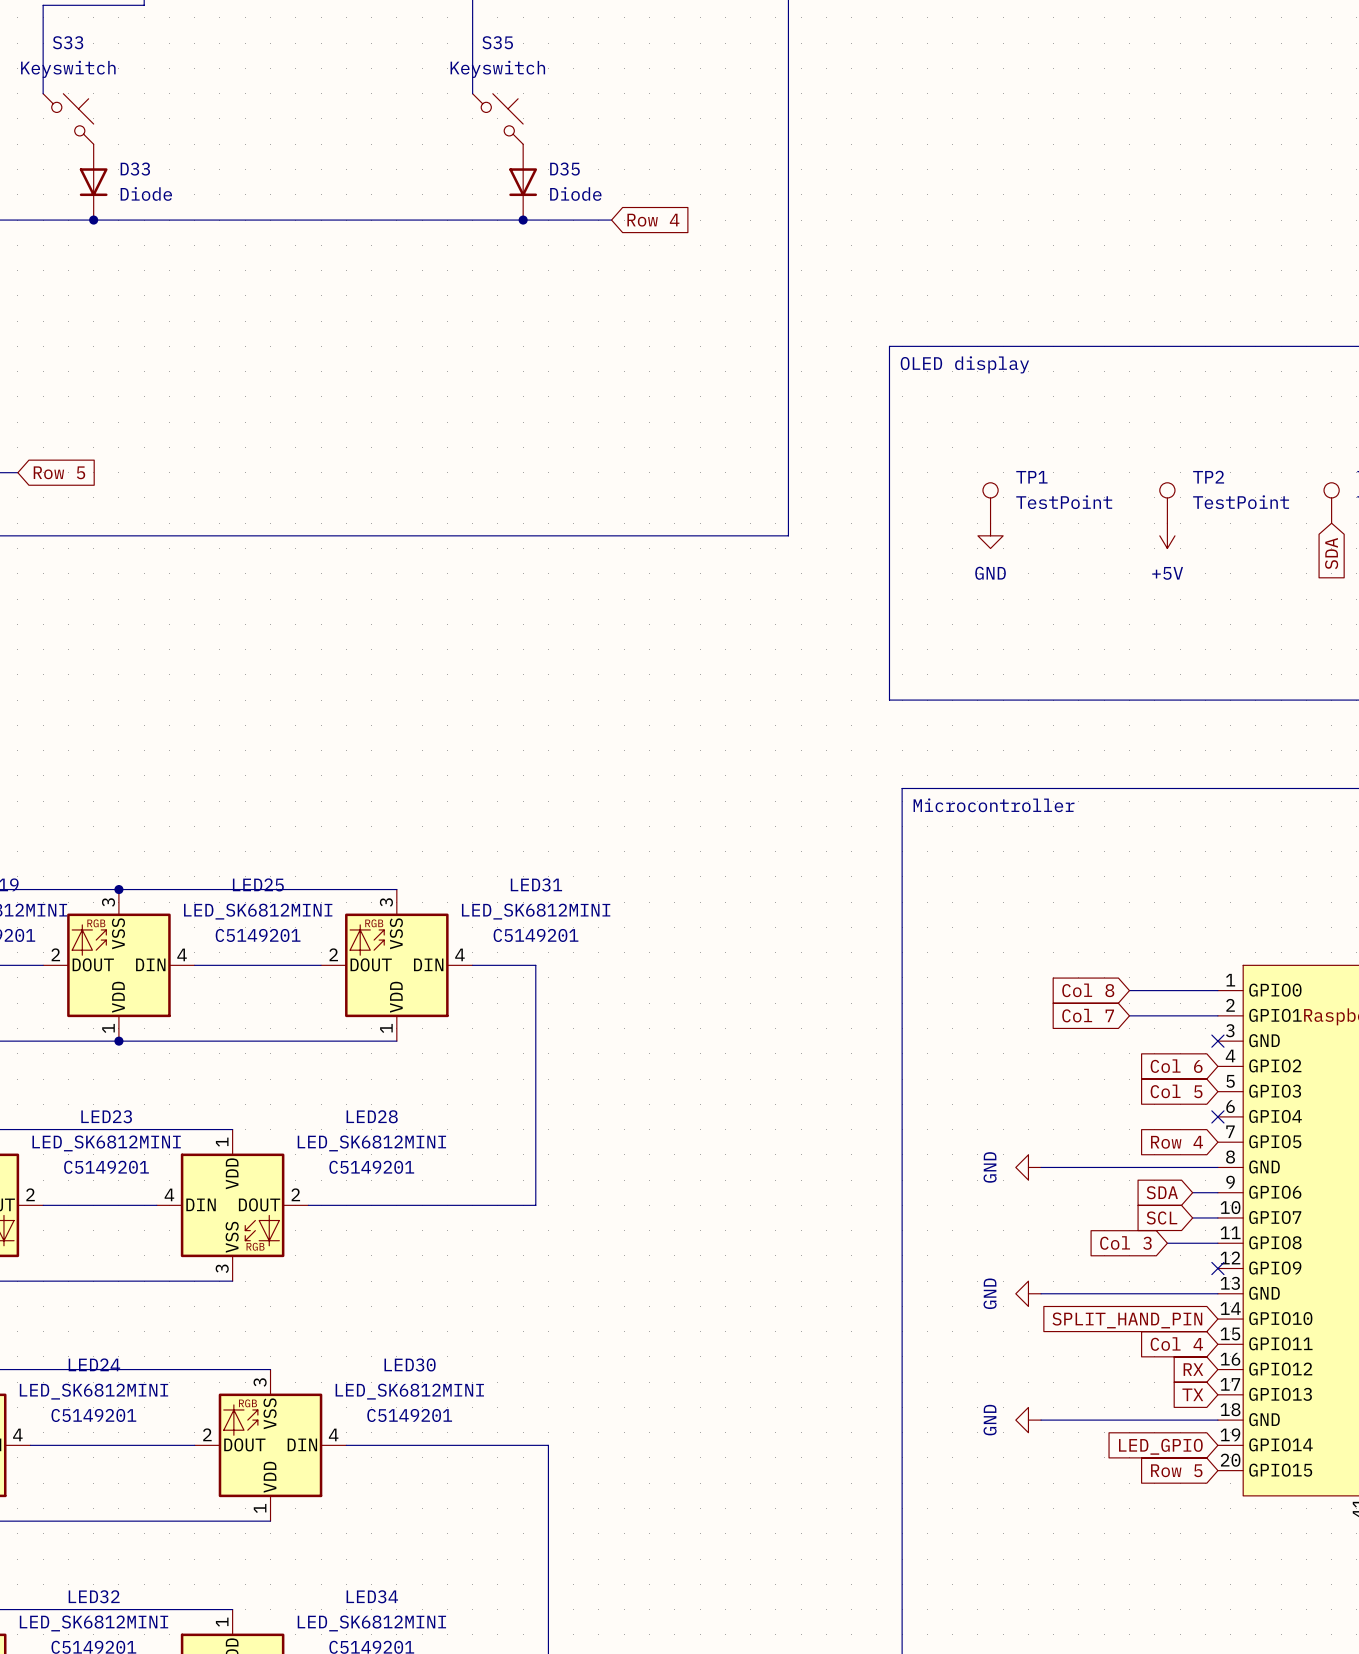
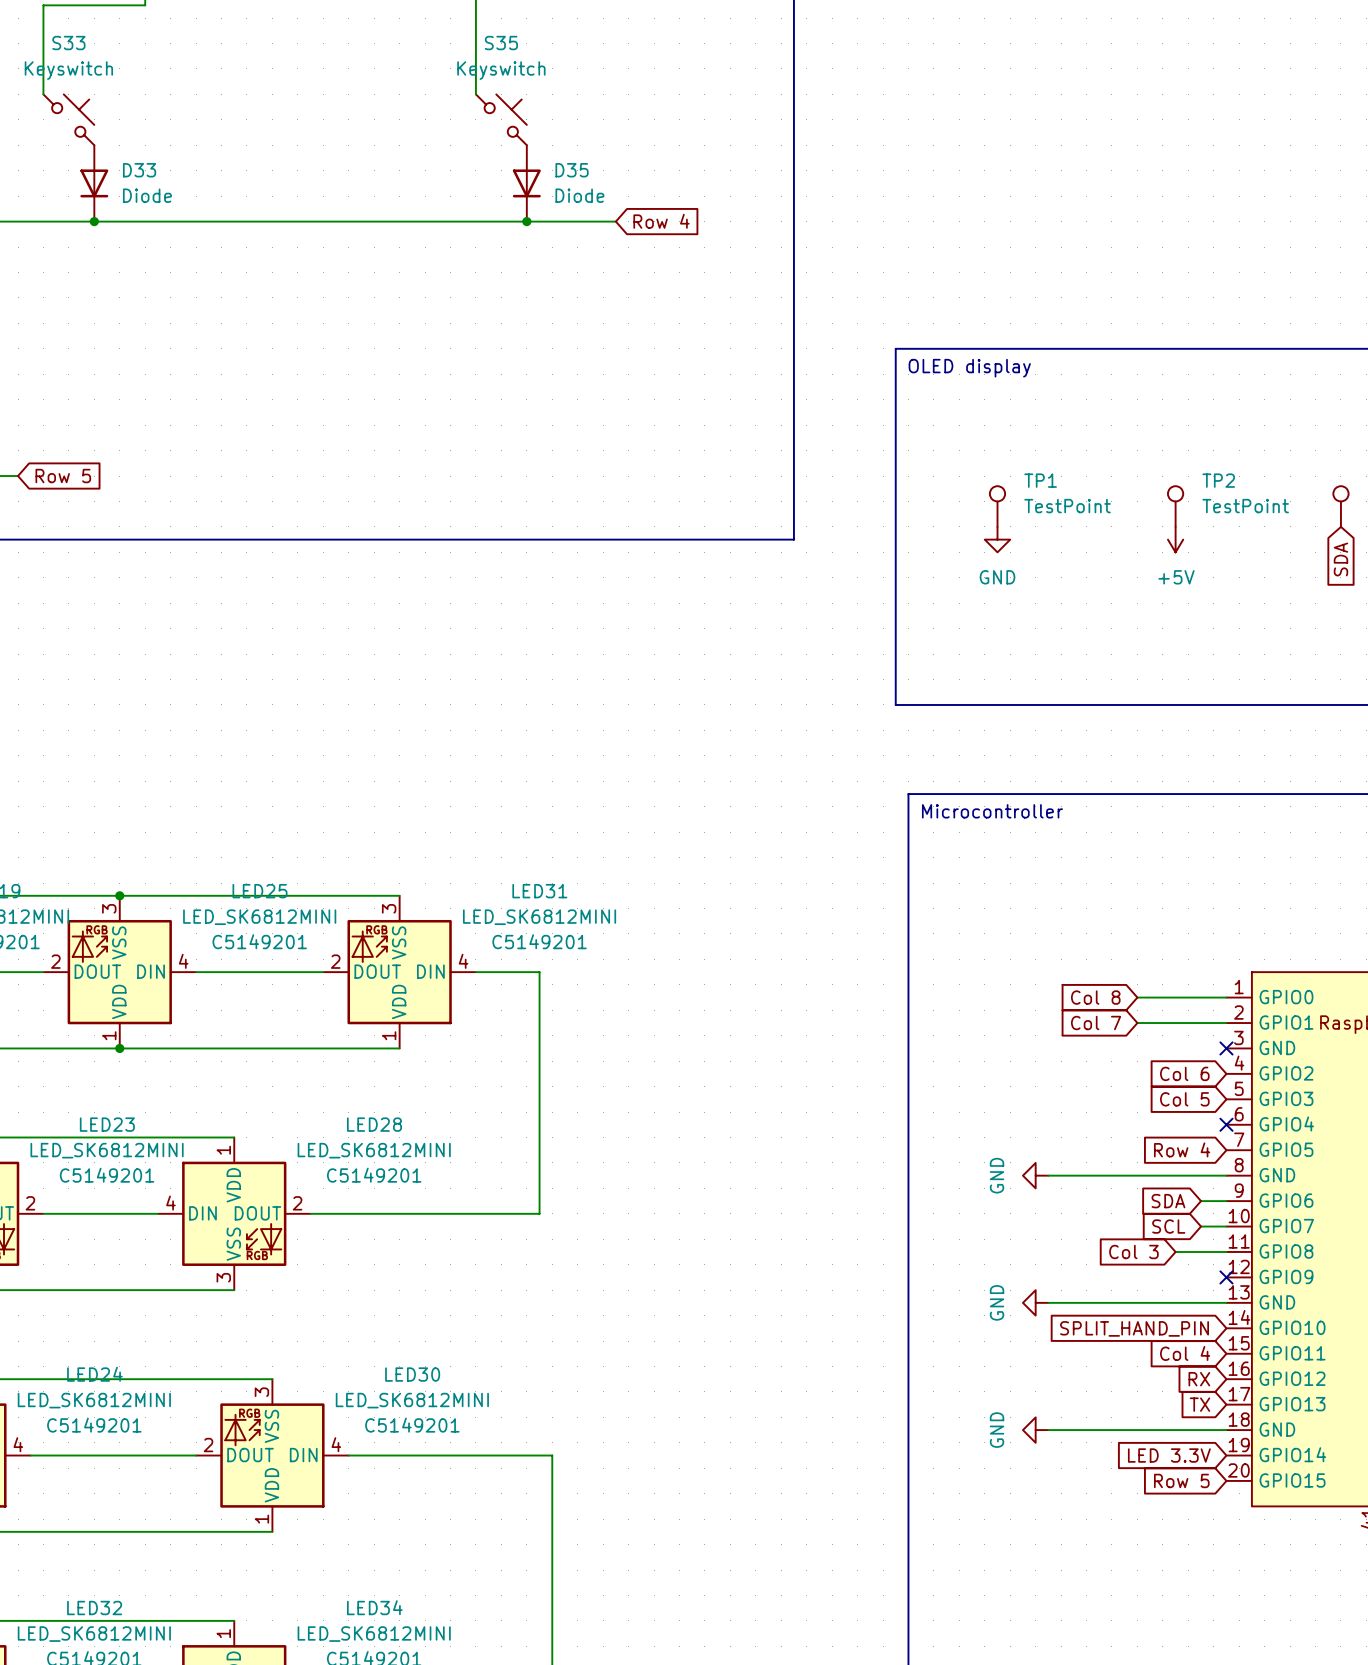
global label: LED_GPIO (1160, 1446) -> LED 3.3V (1169, 1455)

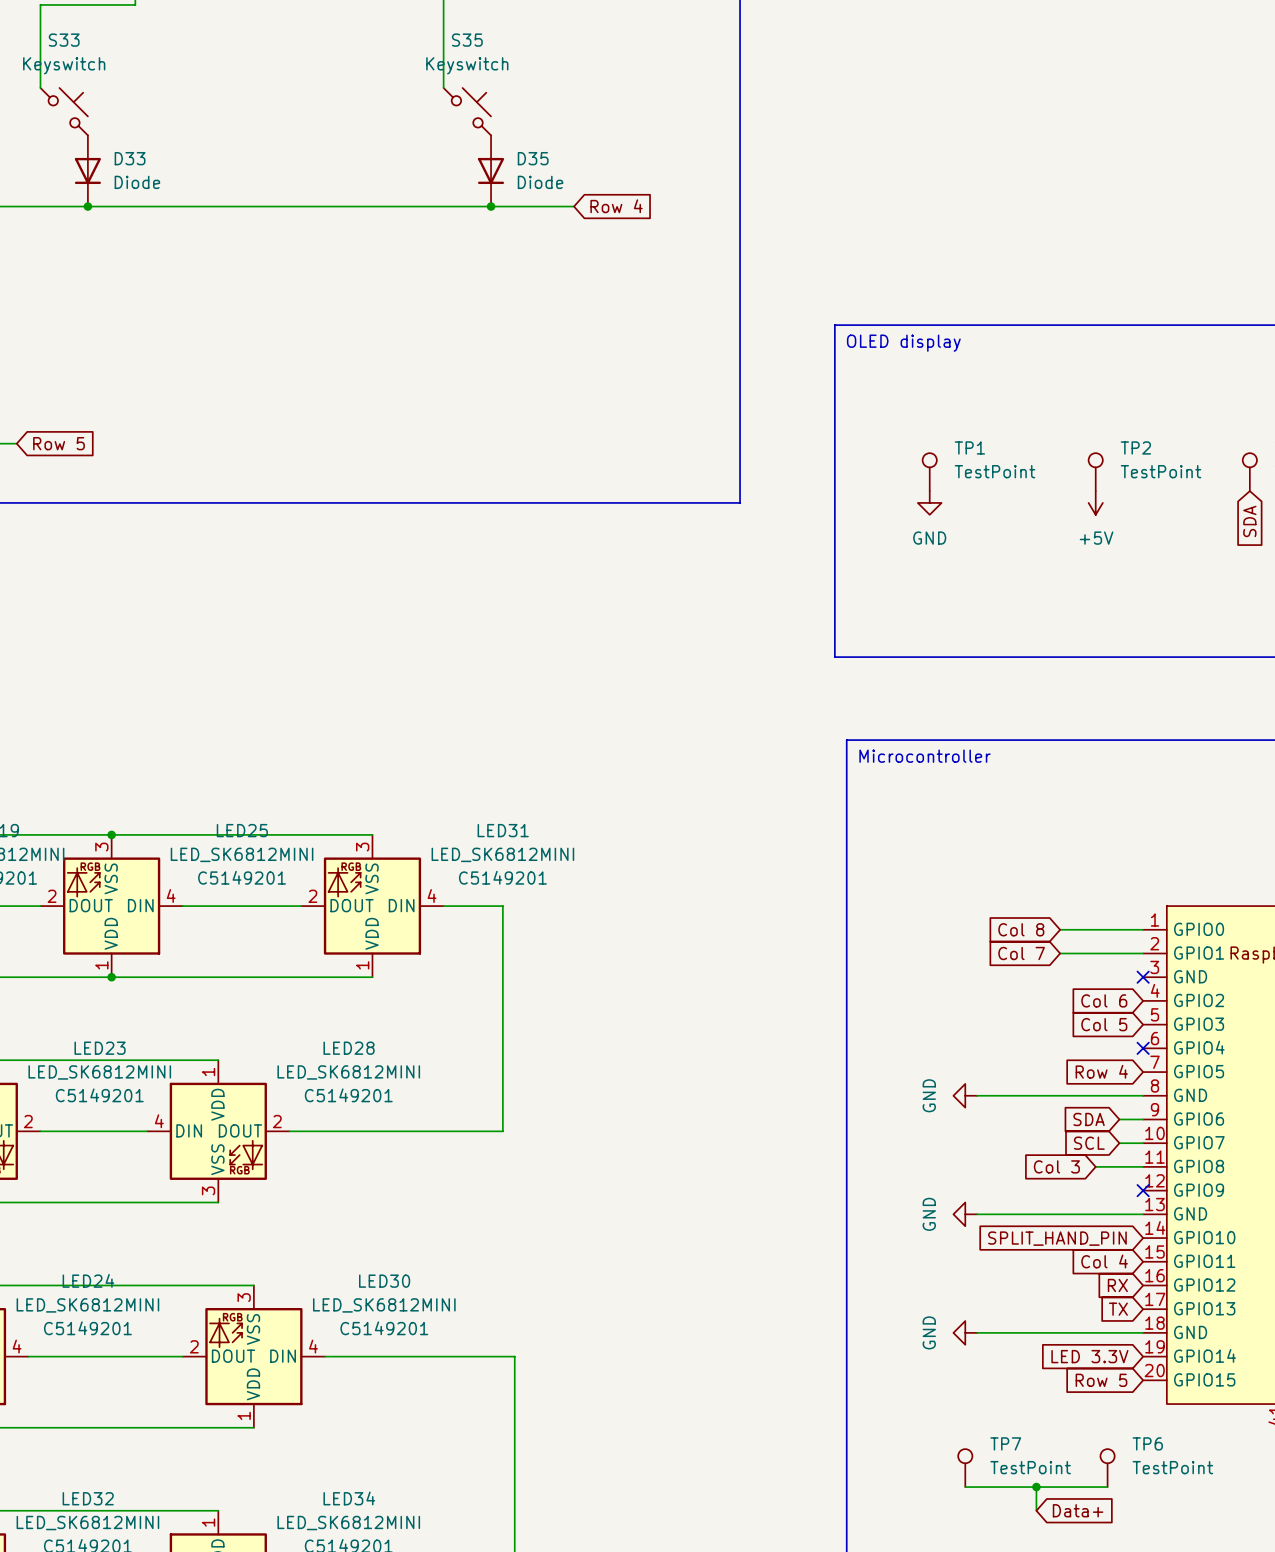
TP7: none -> TestPoint (965, 1468)
TP6: none -> TestPoint (1107, 1468)
wire: none -> (965, 1487) (1107, 1487)
wire: none -> (1036, 1487) (1036, 1510)
junction: none -> (1036, 1487)
global label: none -> Data+ (1078, 1510)

